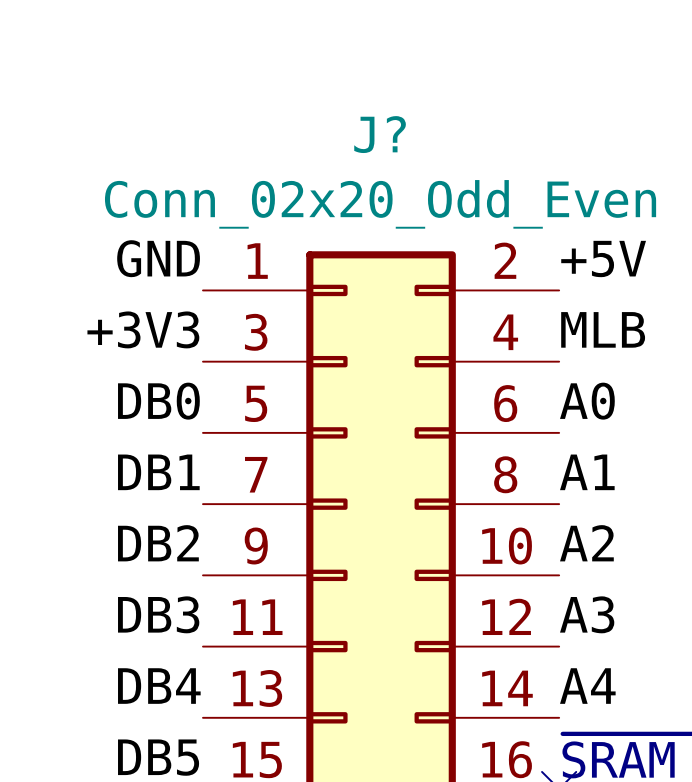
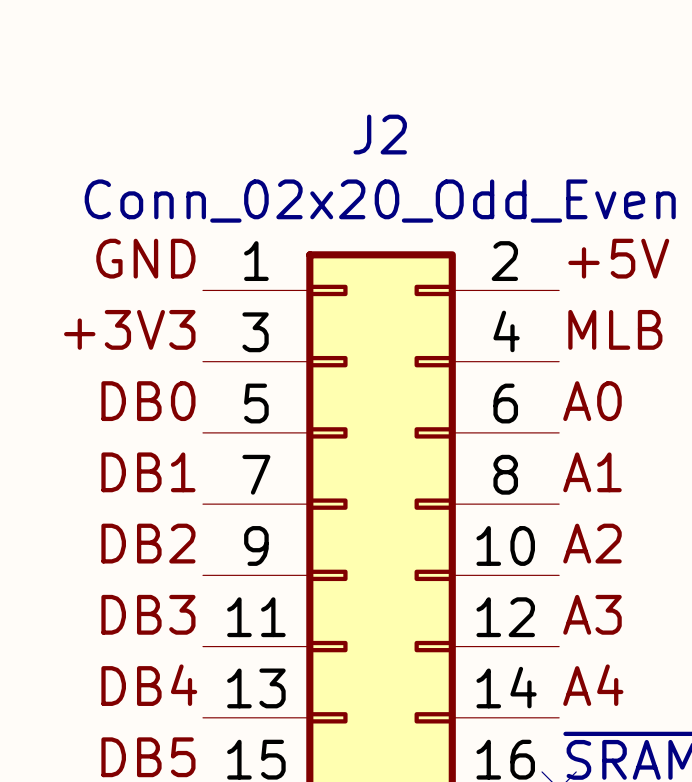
J? name: J? (380, 134) -> J2 (380, 134)

